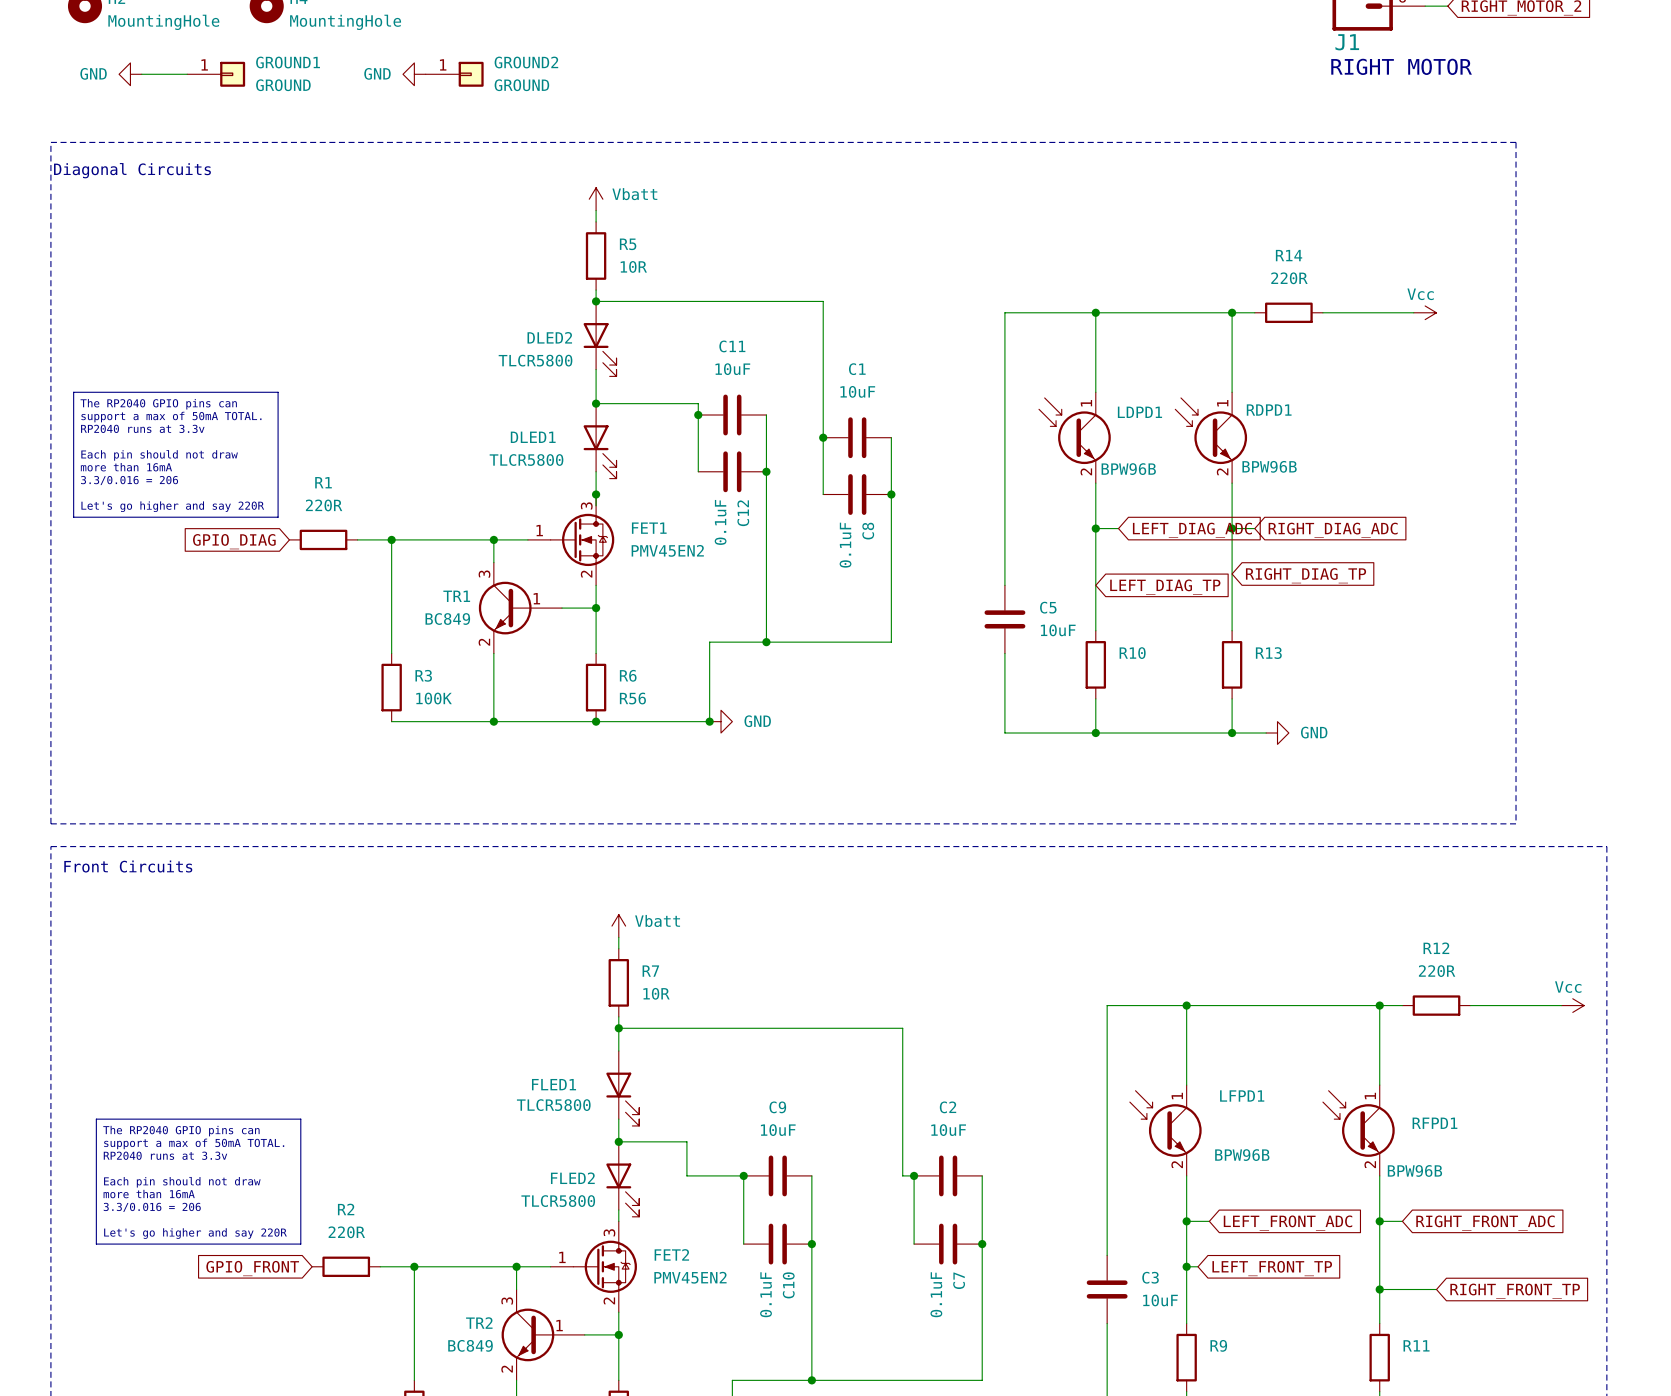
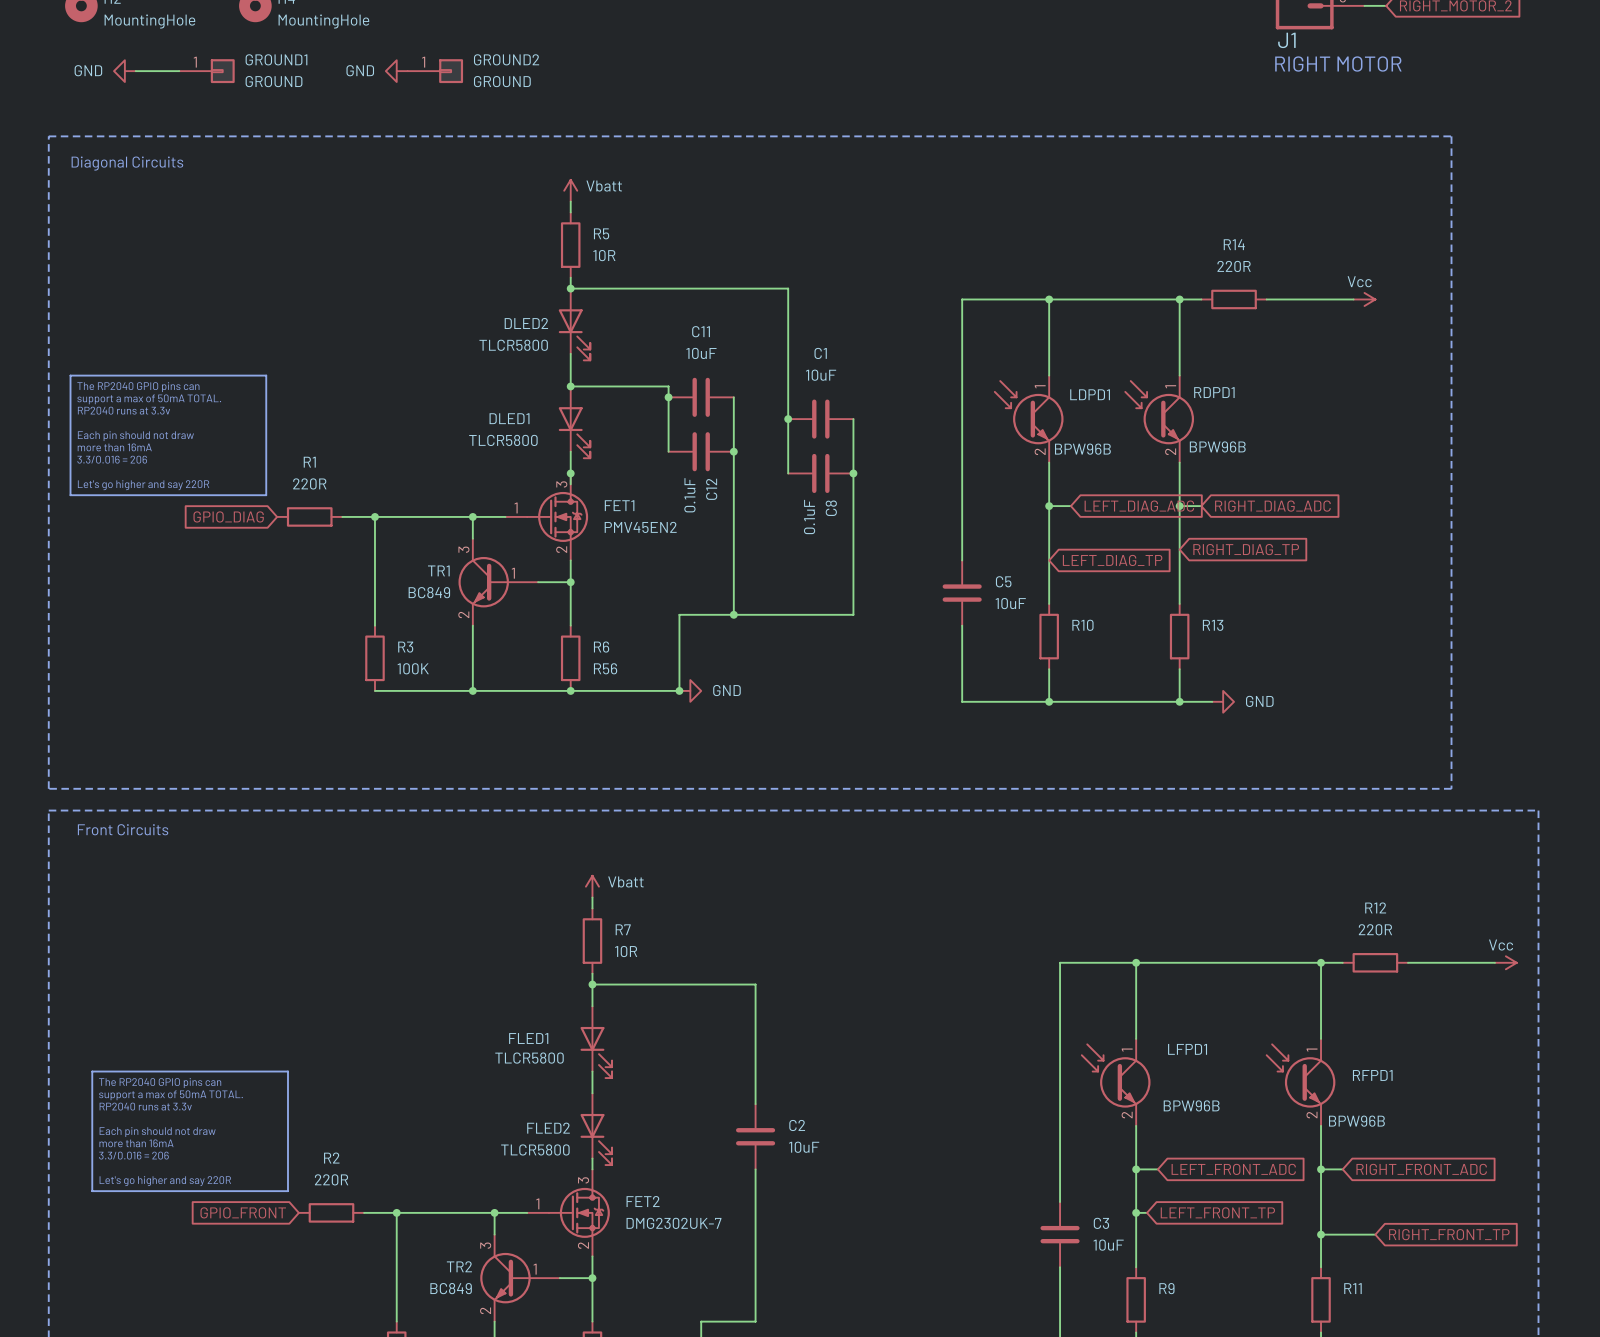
wire: (789, 1028) (902, 1028) (902, 1175) (914, 1175) (914, 1244) -> (755, 984) (755, 1104)
C2 name position: C2 (948, 1107) -> C2 (797, 1125)
wire: (618, 1141) (686, 1141) (686, 1175) (743, 1175) (743, 1244) -> none
junction: (618, 1141) -> none
junction: (743, 1175) -> none
C9: 10uF (777, 1175) -> none
wire: (811, 1175) (811, 1380) -> none
junction: (914, 1175) -> none
C2 rotation: 0° (948, 1175) -> 90° clockwise (755, 1136)
C2 position: (948, 1175) -> (755, 1136)
wire: (982, 1175) (982, 1380) (789, 1380) -> (755, 1169) (755, 1321)
C10: 0.1uF (777, 1244) -> none
junction: (811, 1244) -> none
C7: 0.1uF (948, 1244) -> none
junction: (982, 1244) -> none
FET2 value: PMV45EN2 (690, 1277) -> DMG2302UK-7 (673, 1223)
junction: (811, 1380) -> none

